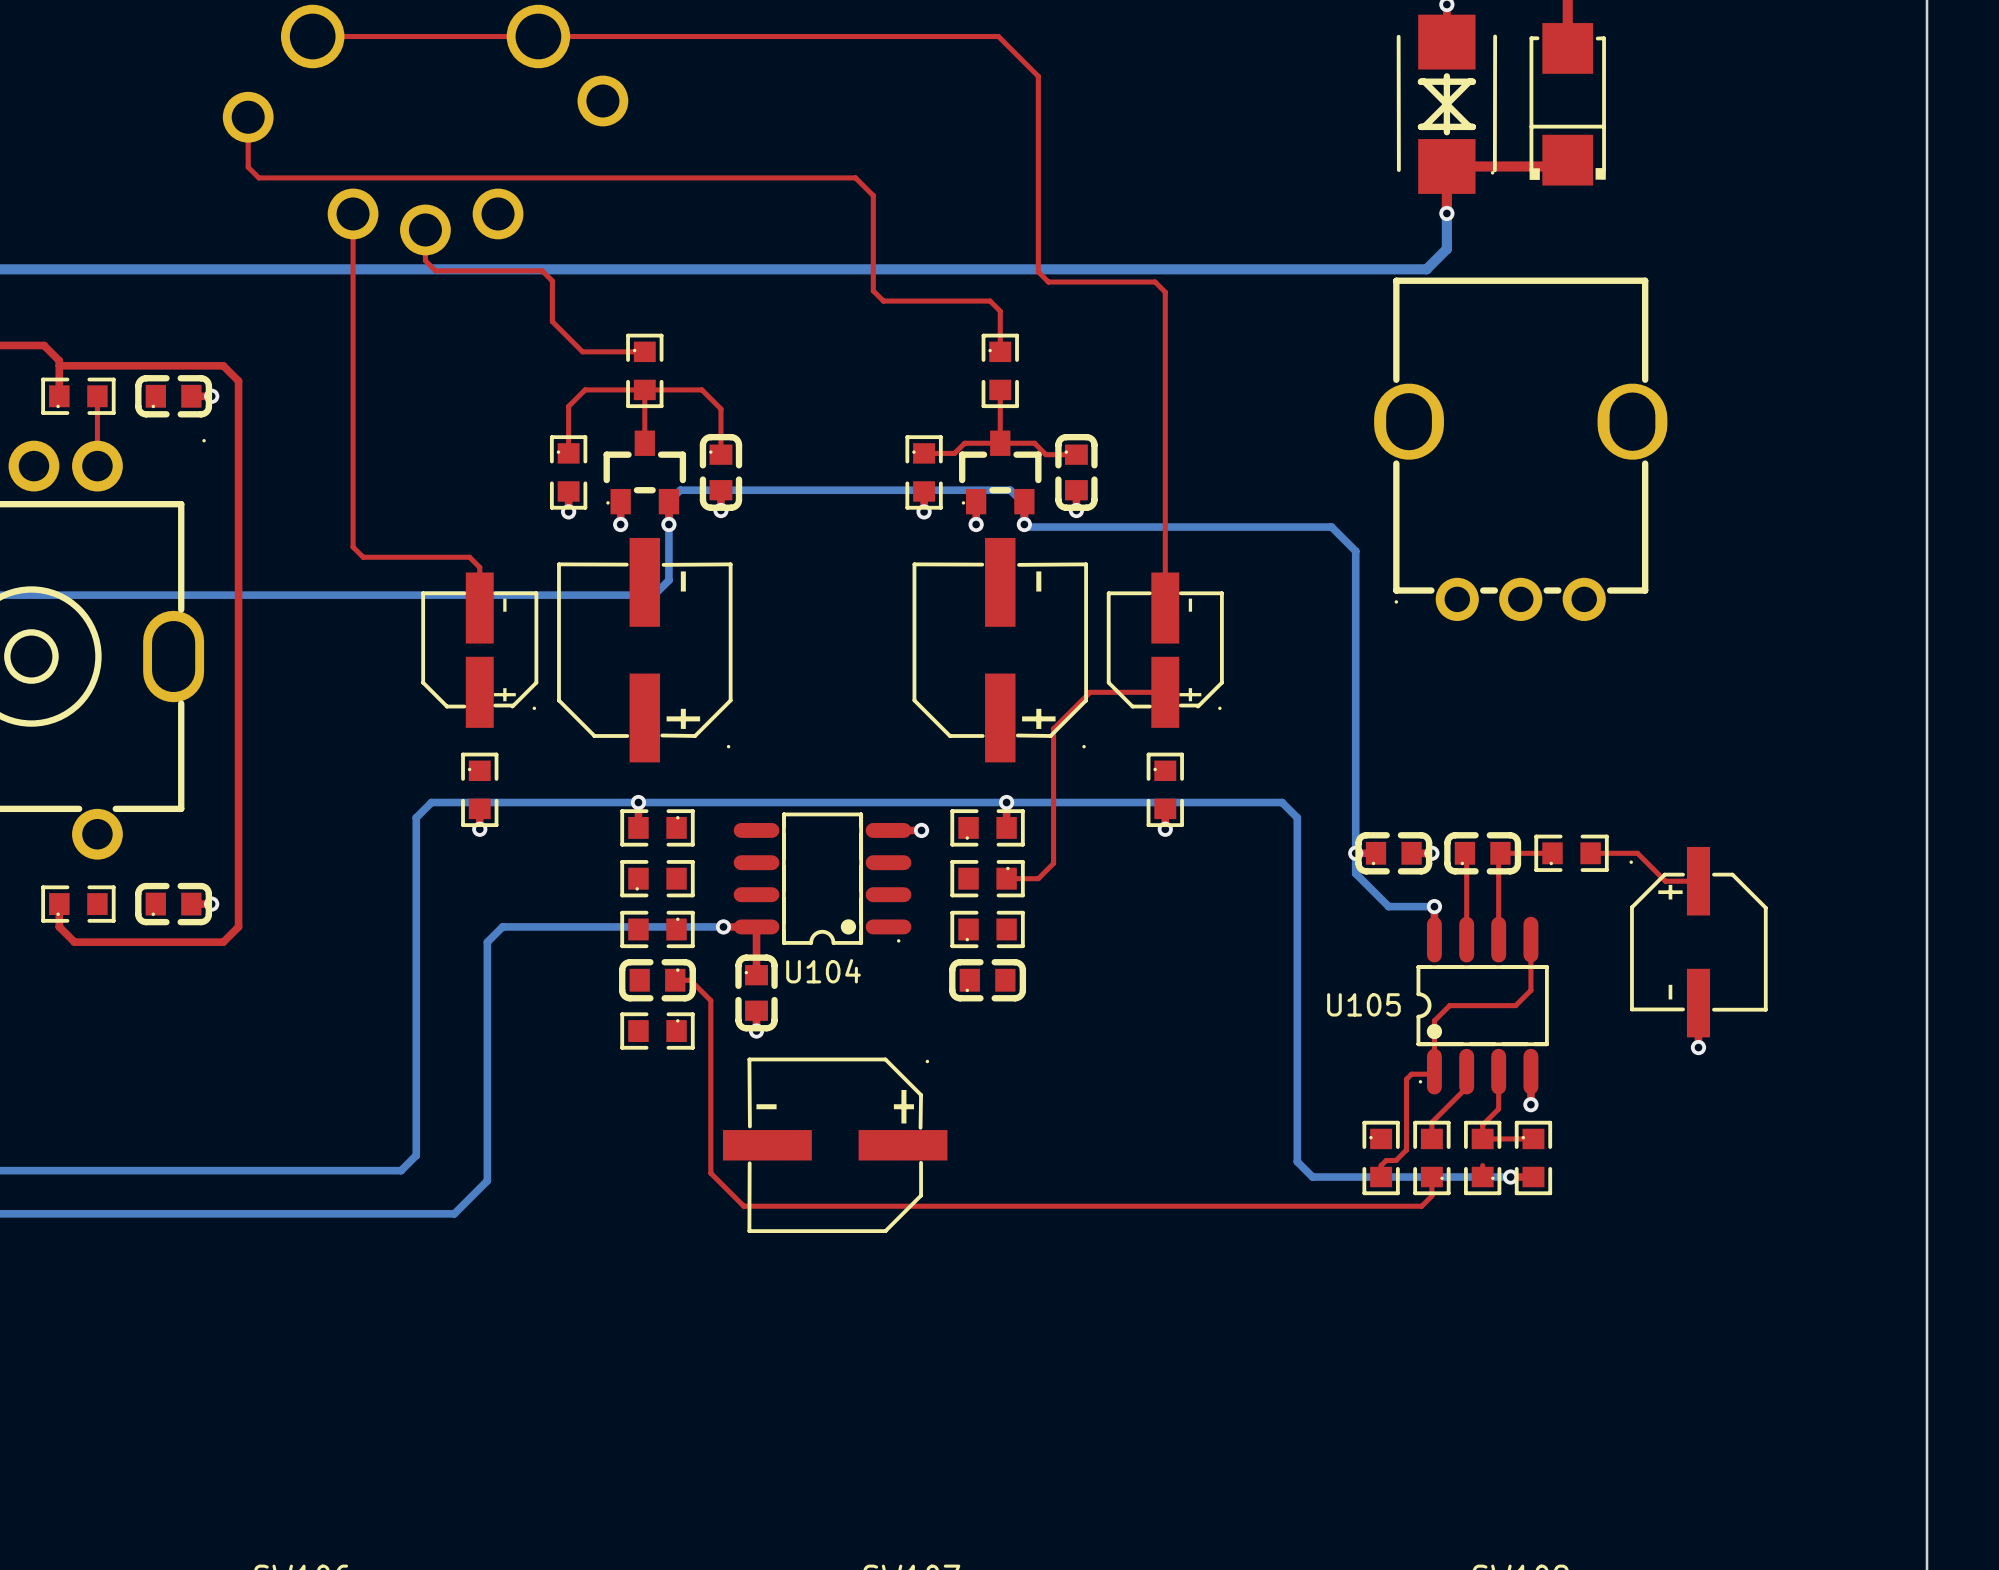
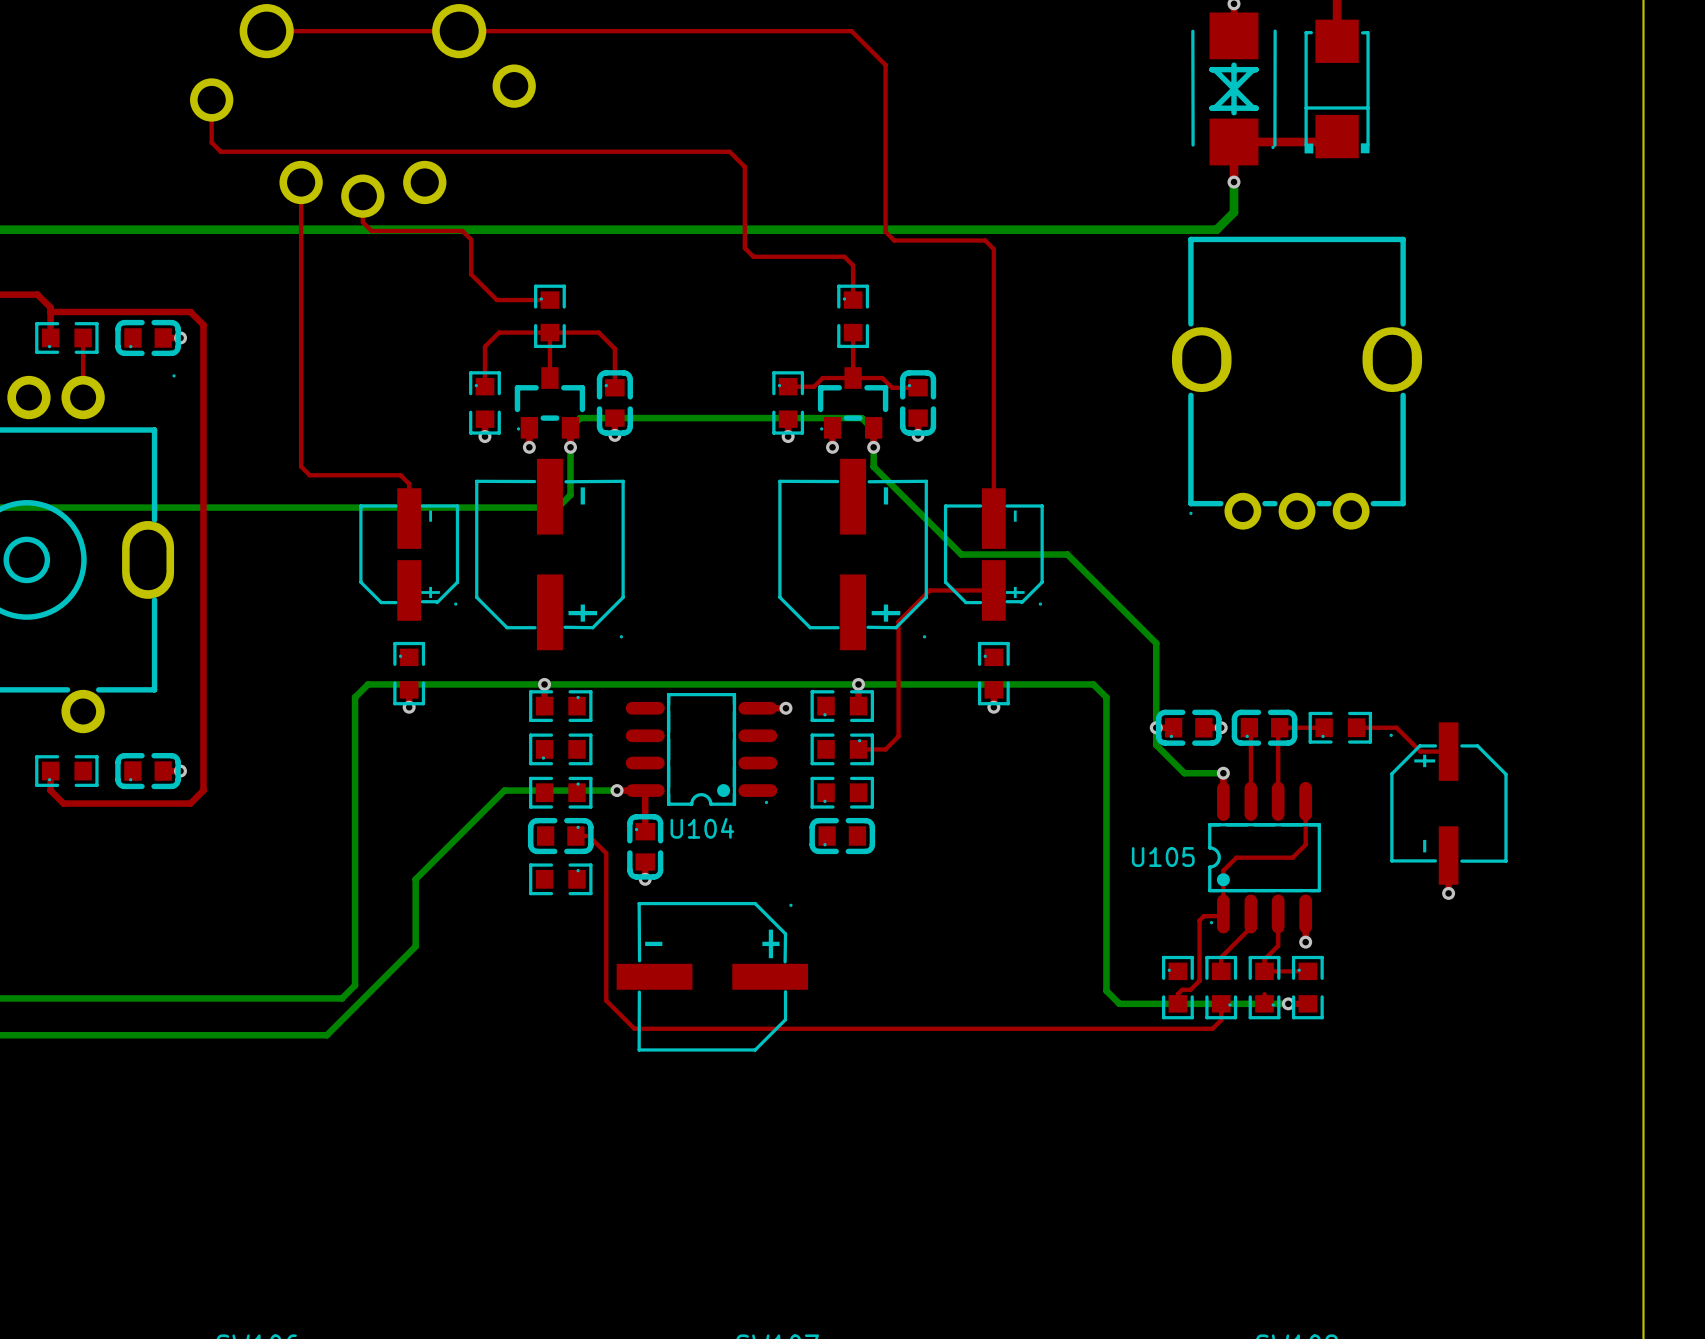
bottom track: (1024, 527) (1331, 527) (1355, 551) (1355, 754) -> (873, 449) (873, 466) (961, 554) (1067, 554) (1156, 643)
bottom track: (591, 926) (502, 926) (487, 942) (487, 1031) -> (504, 790) (415, 879)
bottom track: (487, 1109) (487, 1180) (454, 1213) (383, 1213) -> (415, 946) (326, 1035)

